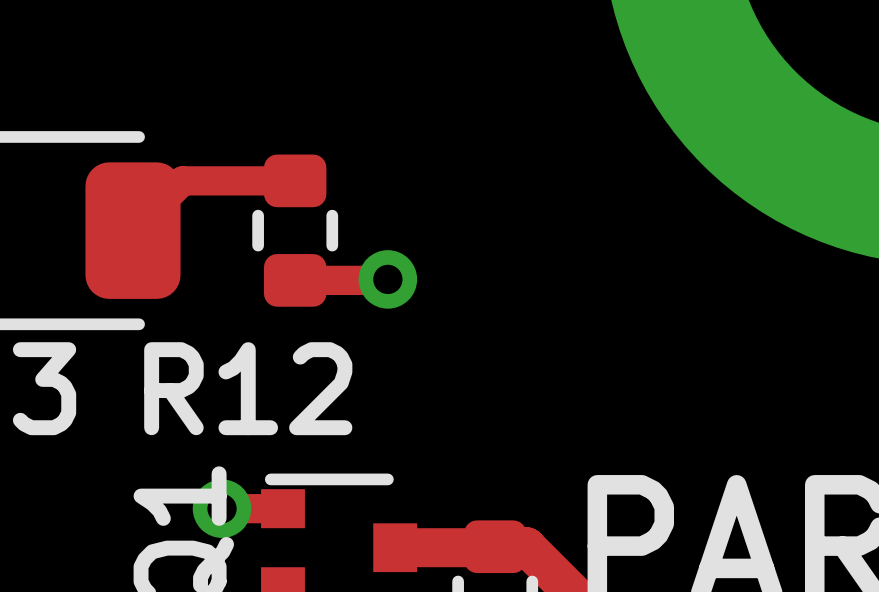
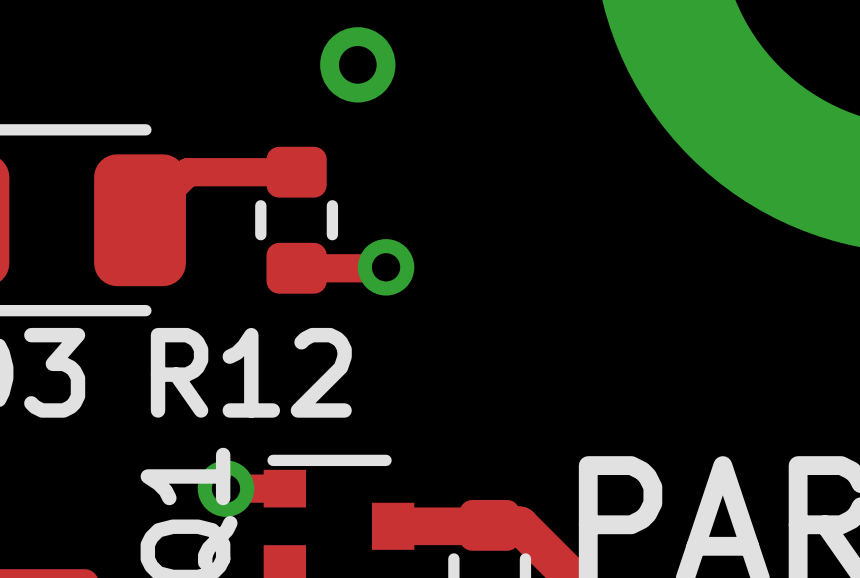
via: none -> (357, 64)

